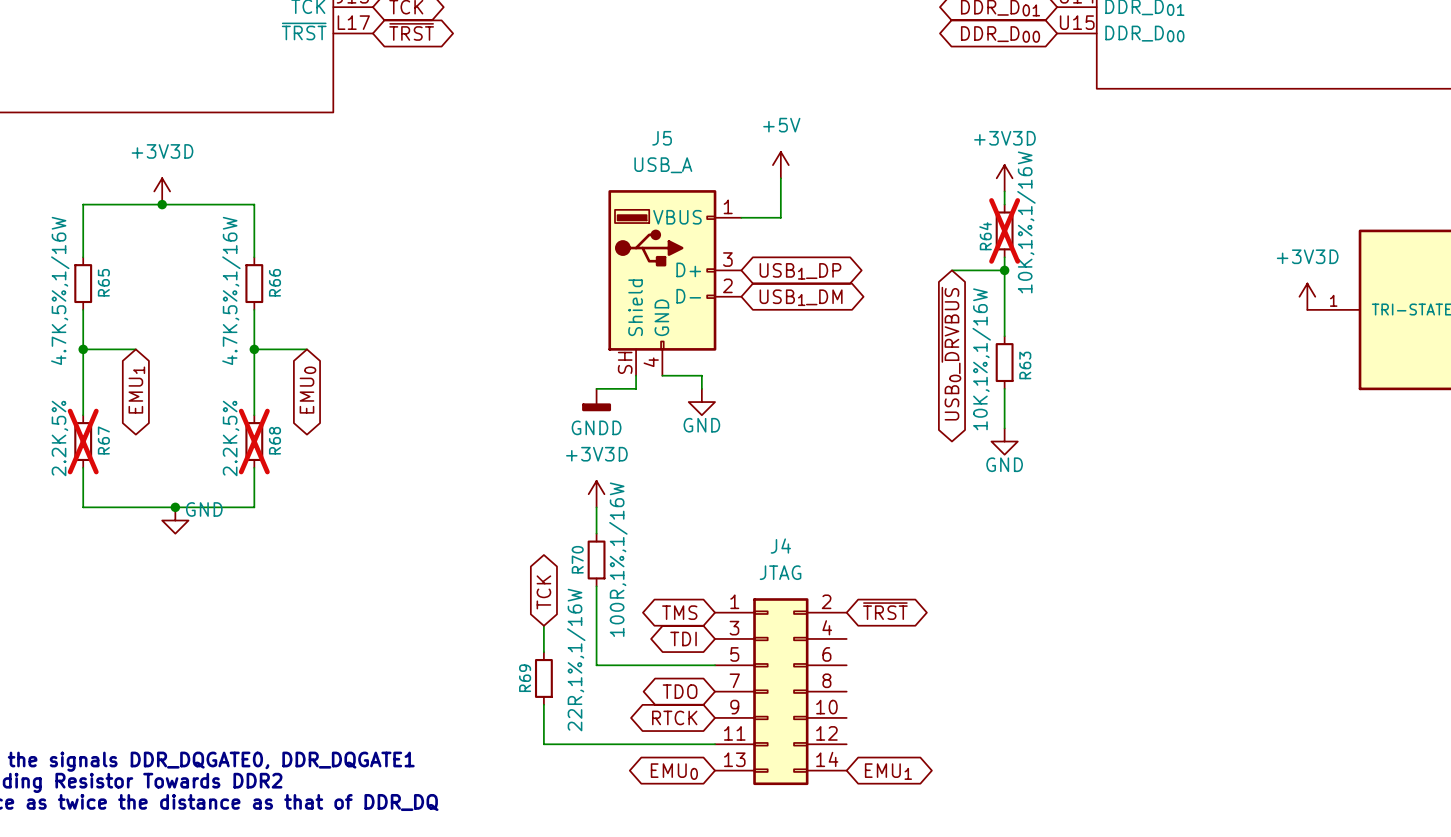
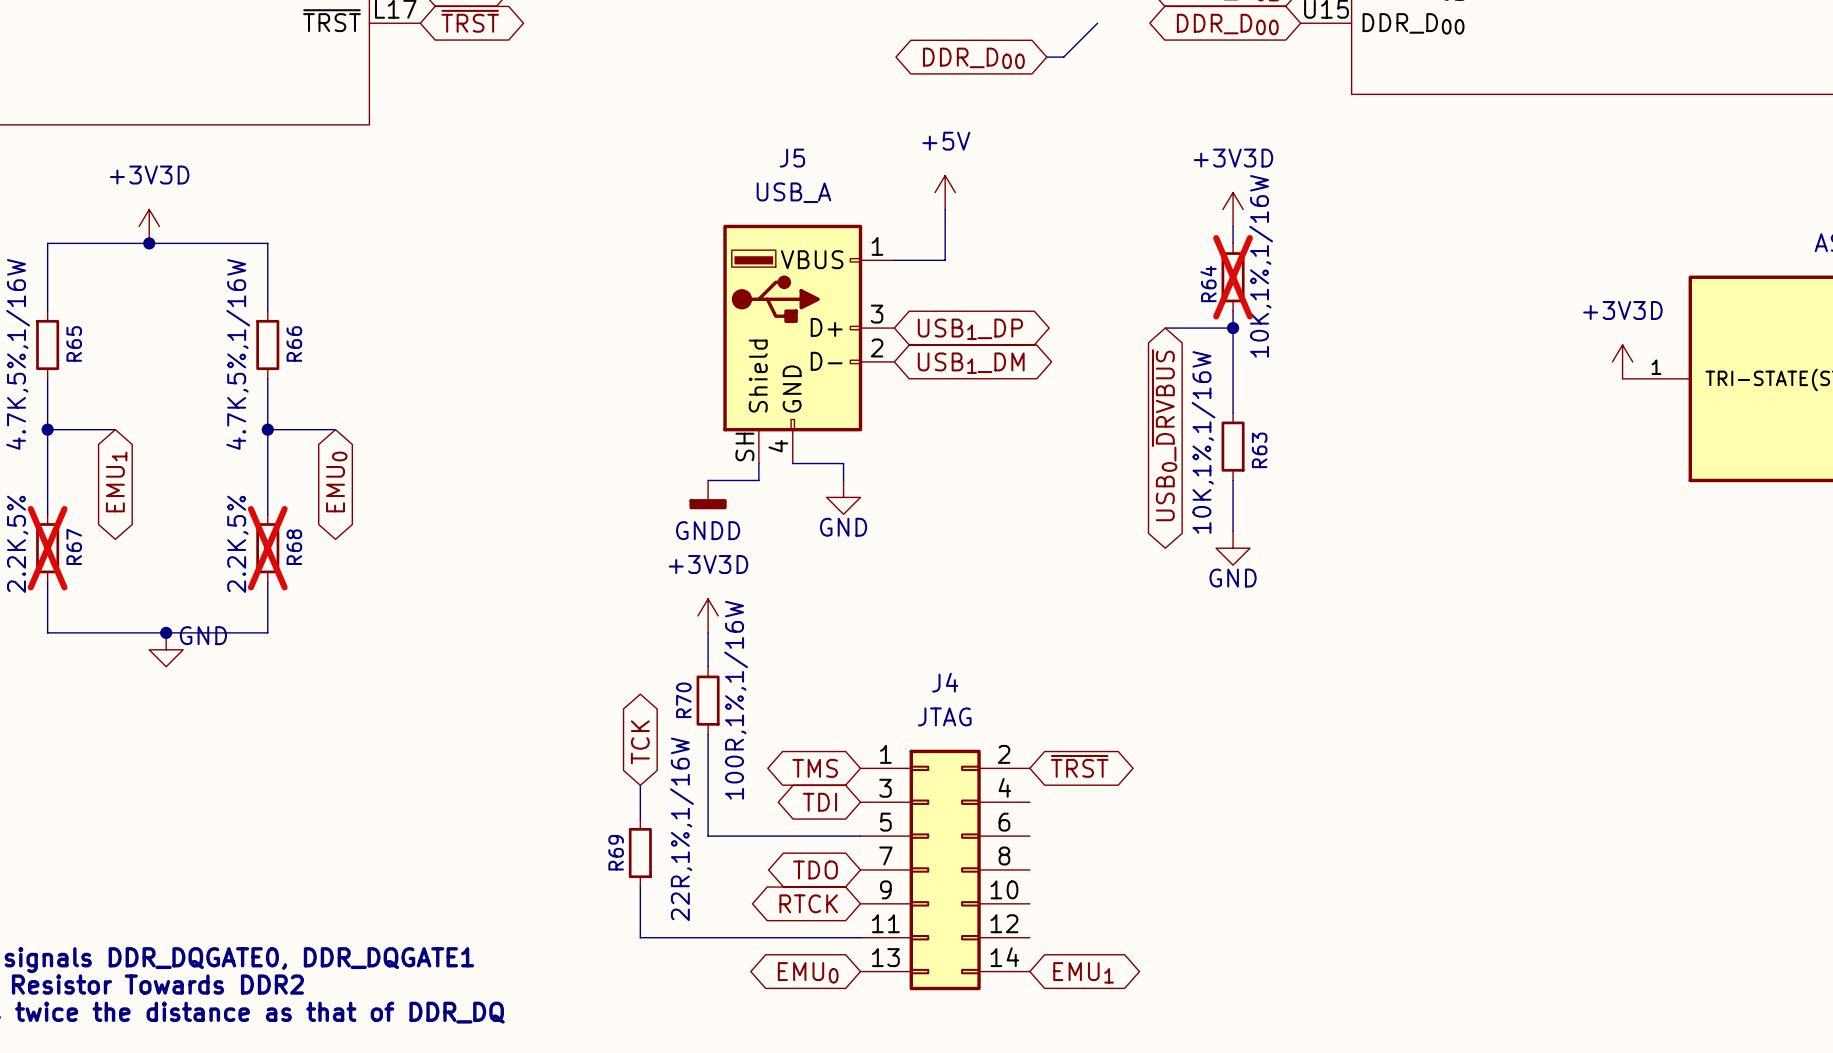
wire: none -> (1097, 23) (1063, 57) (1046, 57)
global label: none -> DDR_D00 (973, 58)

